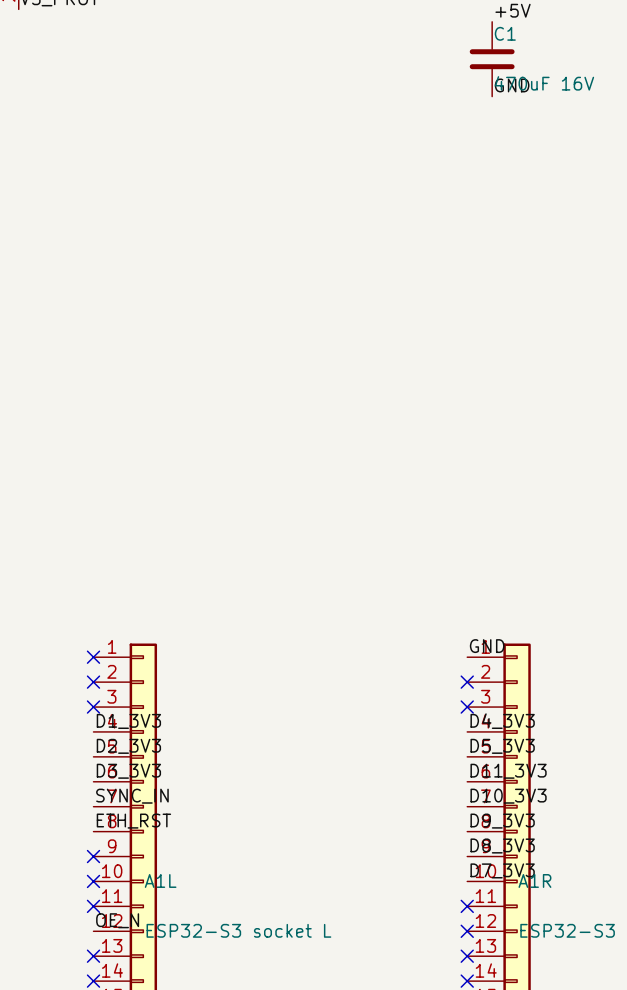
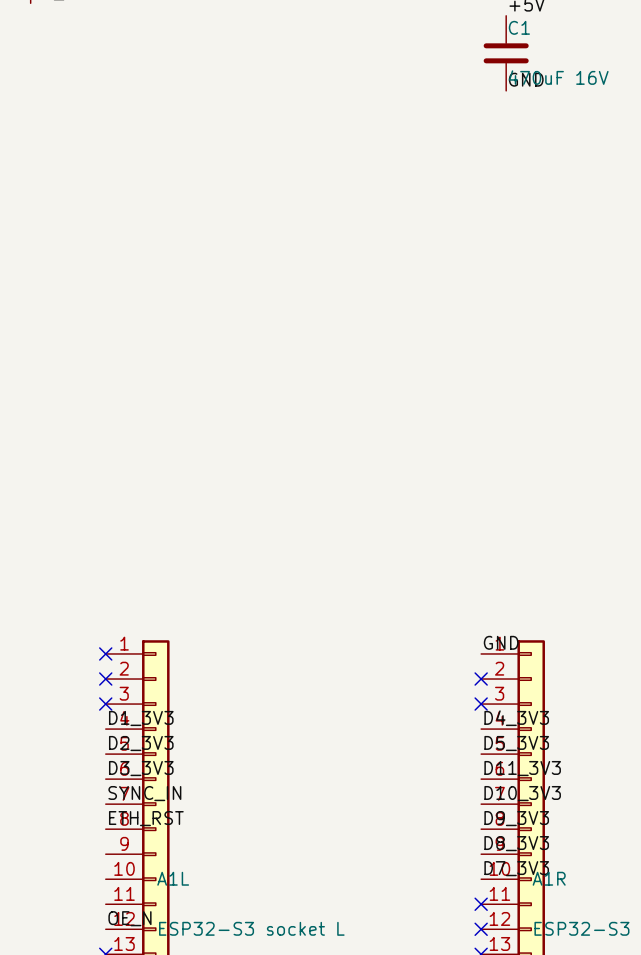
no-connect mark: (93, 856) -> none
no-connect mark: (93, 881) -> none
no-connect mark: (93, 906) -> none

